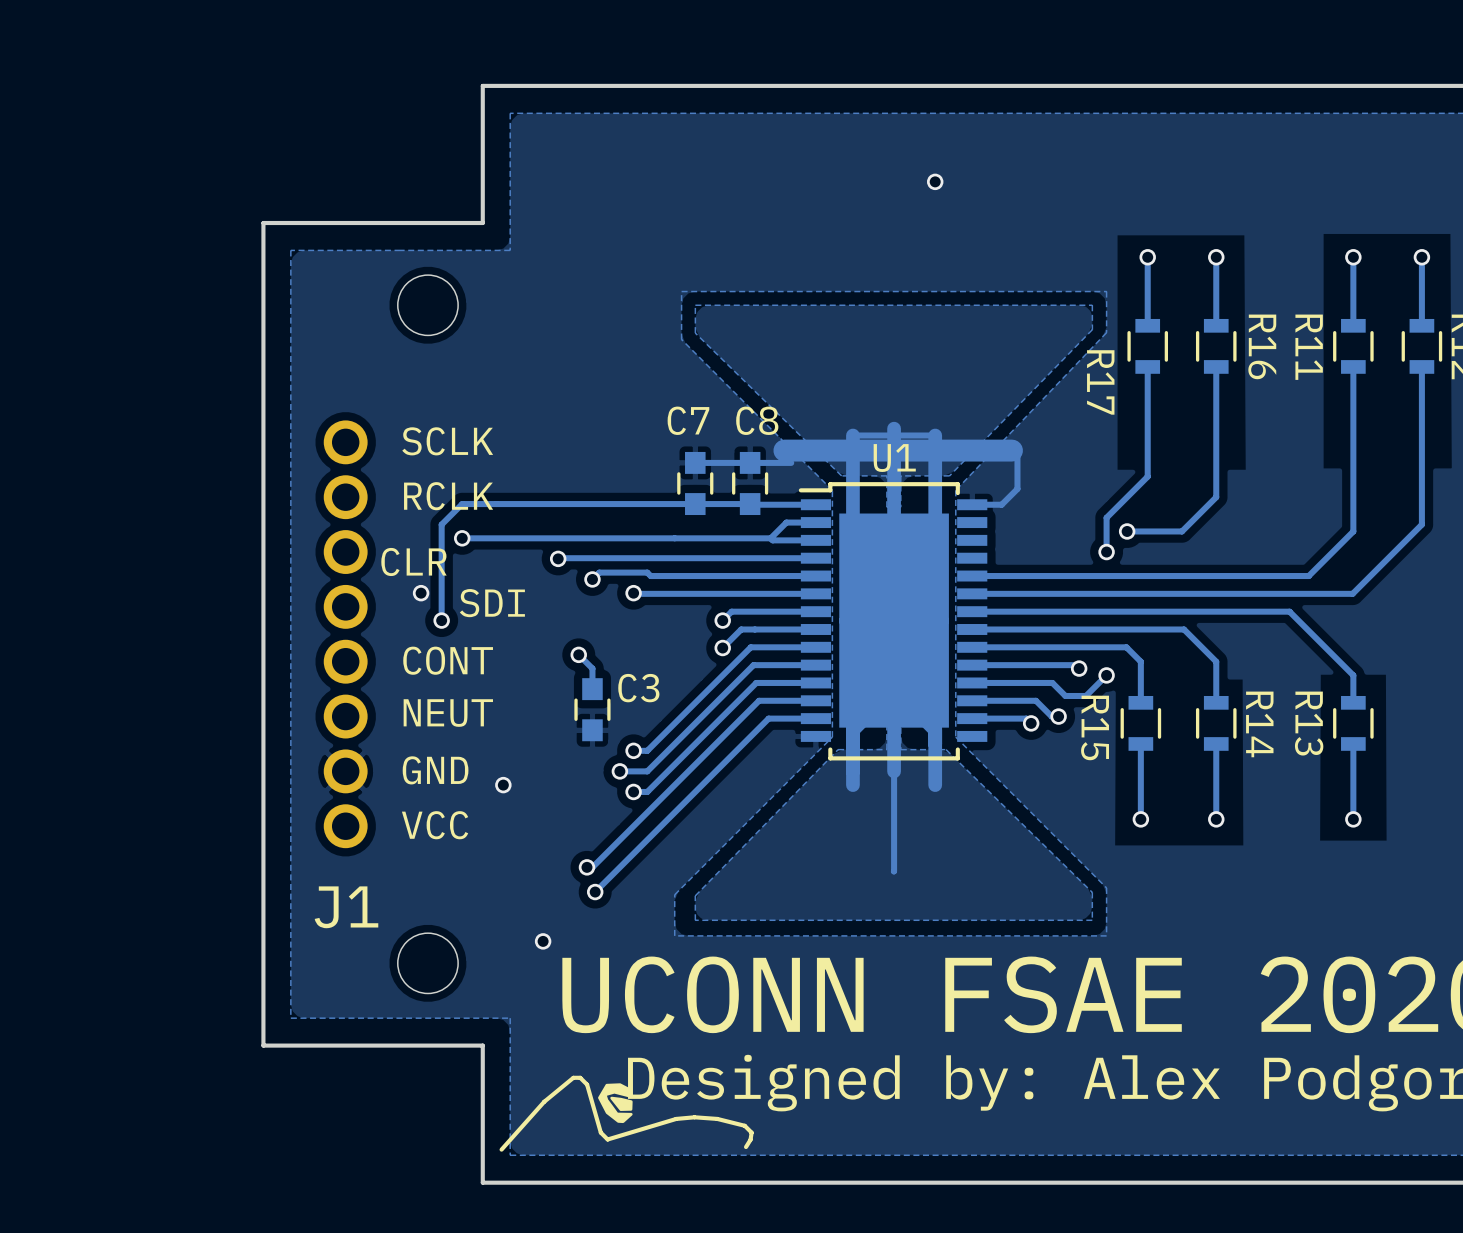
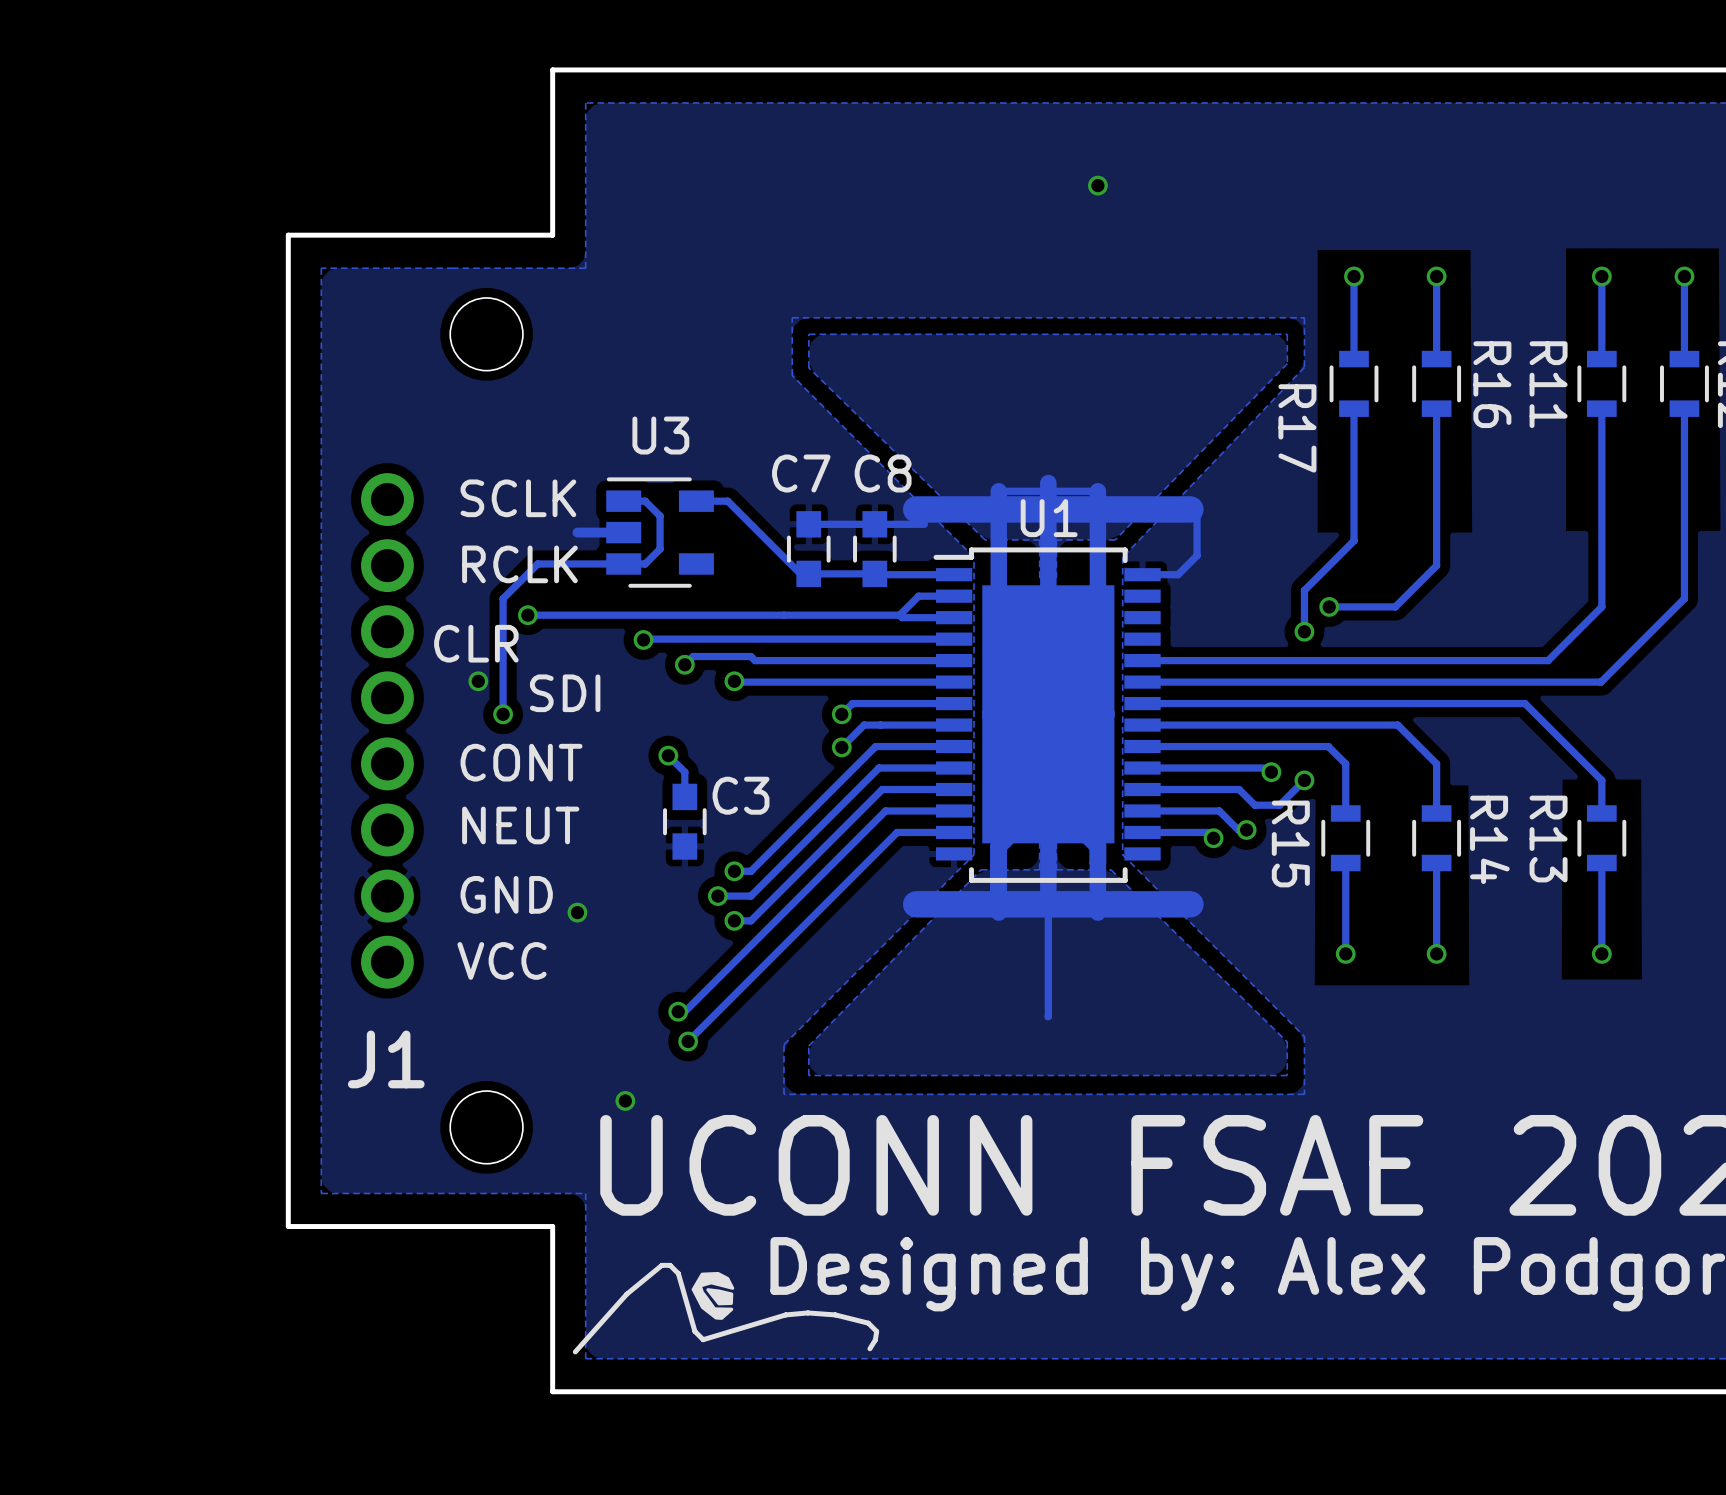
track: none -> (623, 501) (645, 501) (660, 516) (660, 549) (645, 563) (537, 563) (527, 573)
track: none -> (623, 532) (577, 532)
U3: none -> (660, 532)
track: (688, 504) (462, 504) -> (800, 573) (727, 501) (696, 501)
track: none -> (1190, 904) (916, 904)

